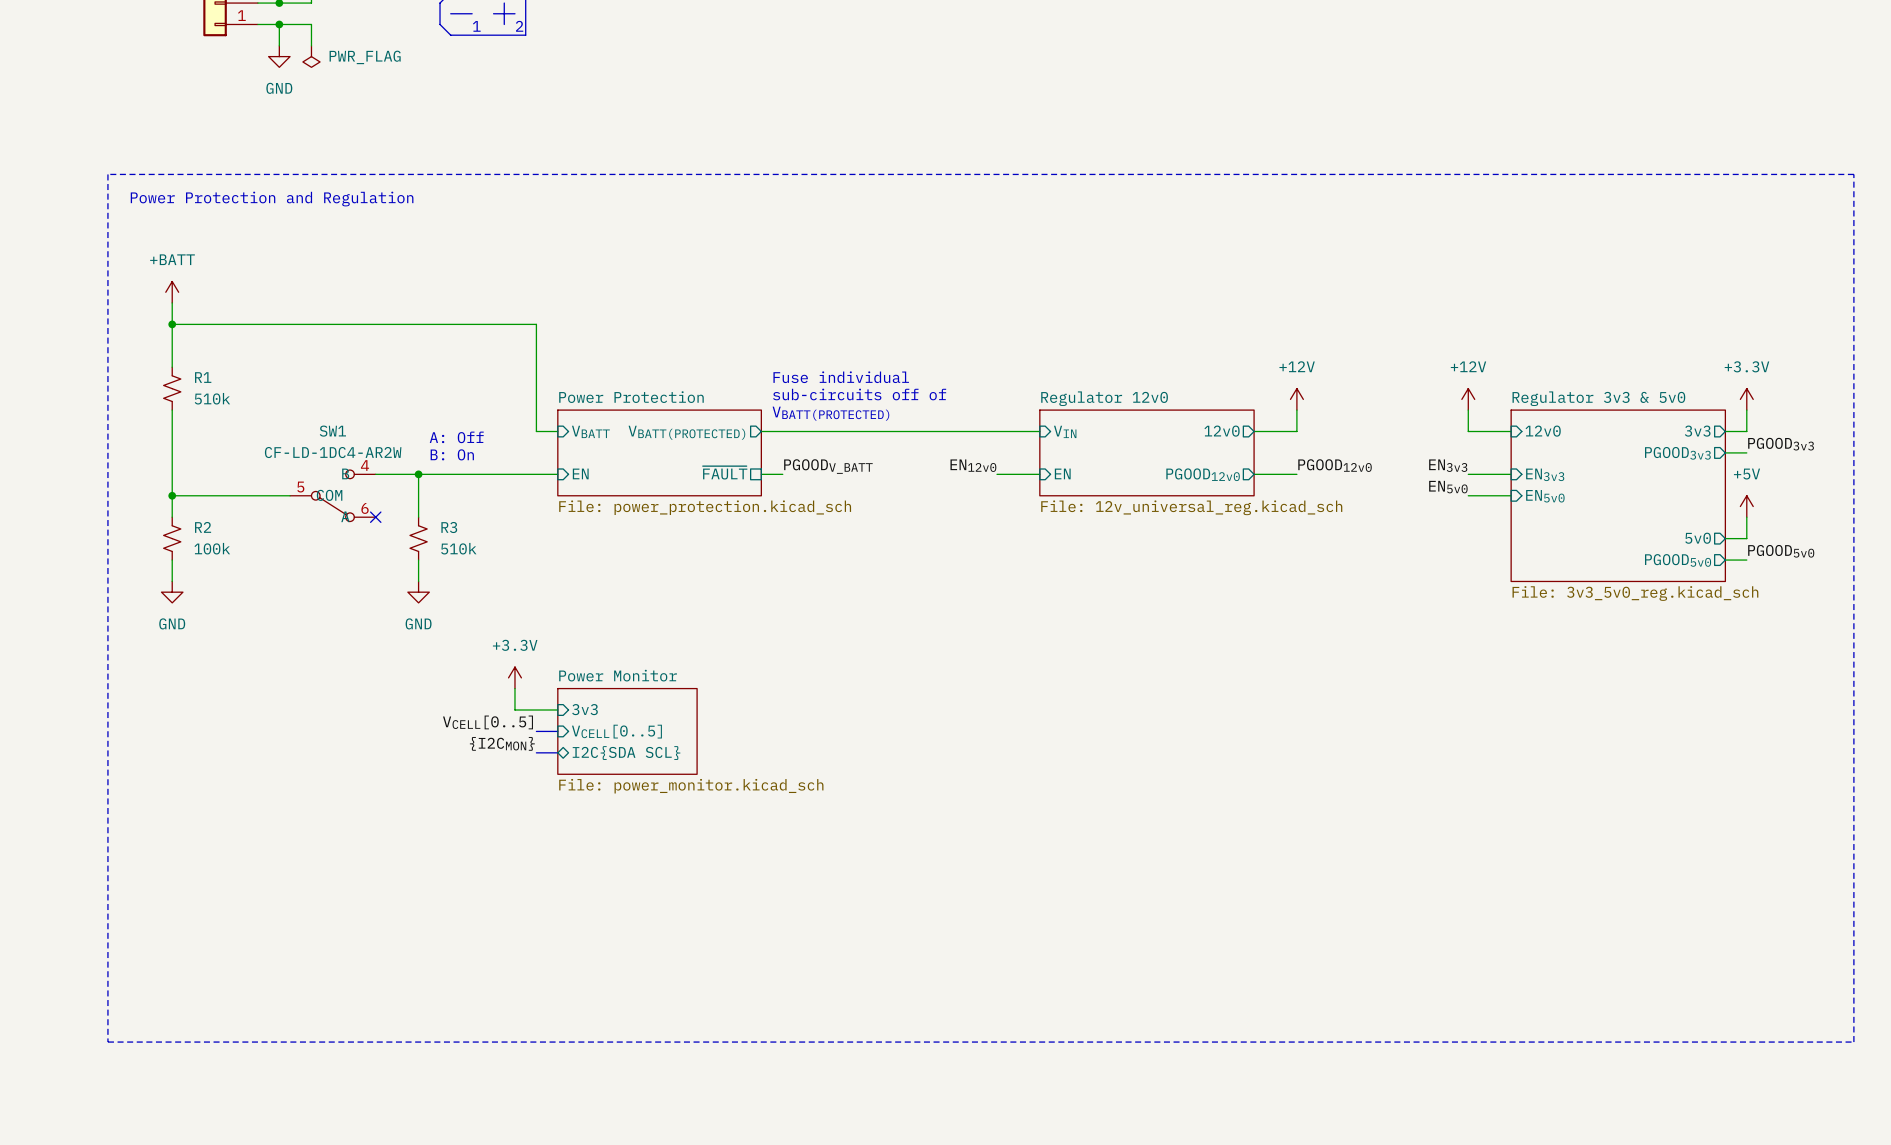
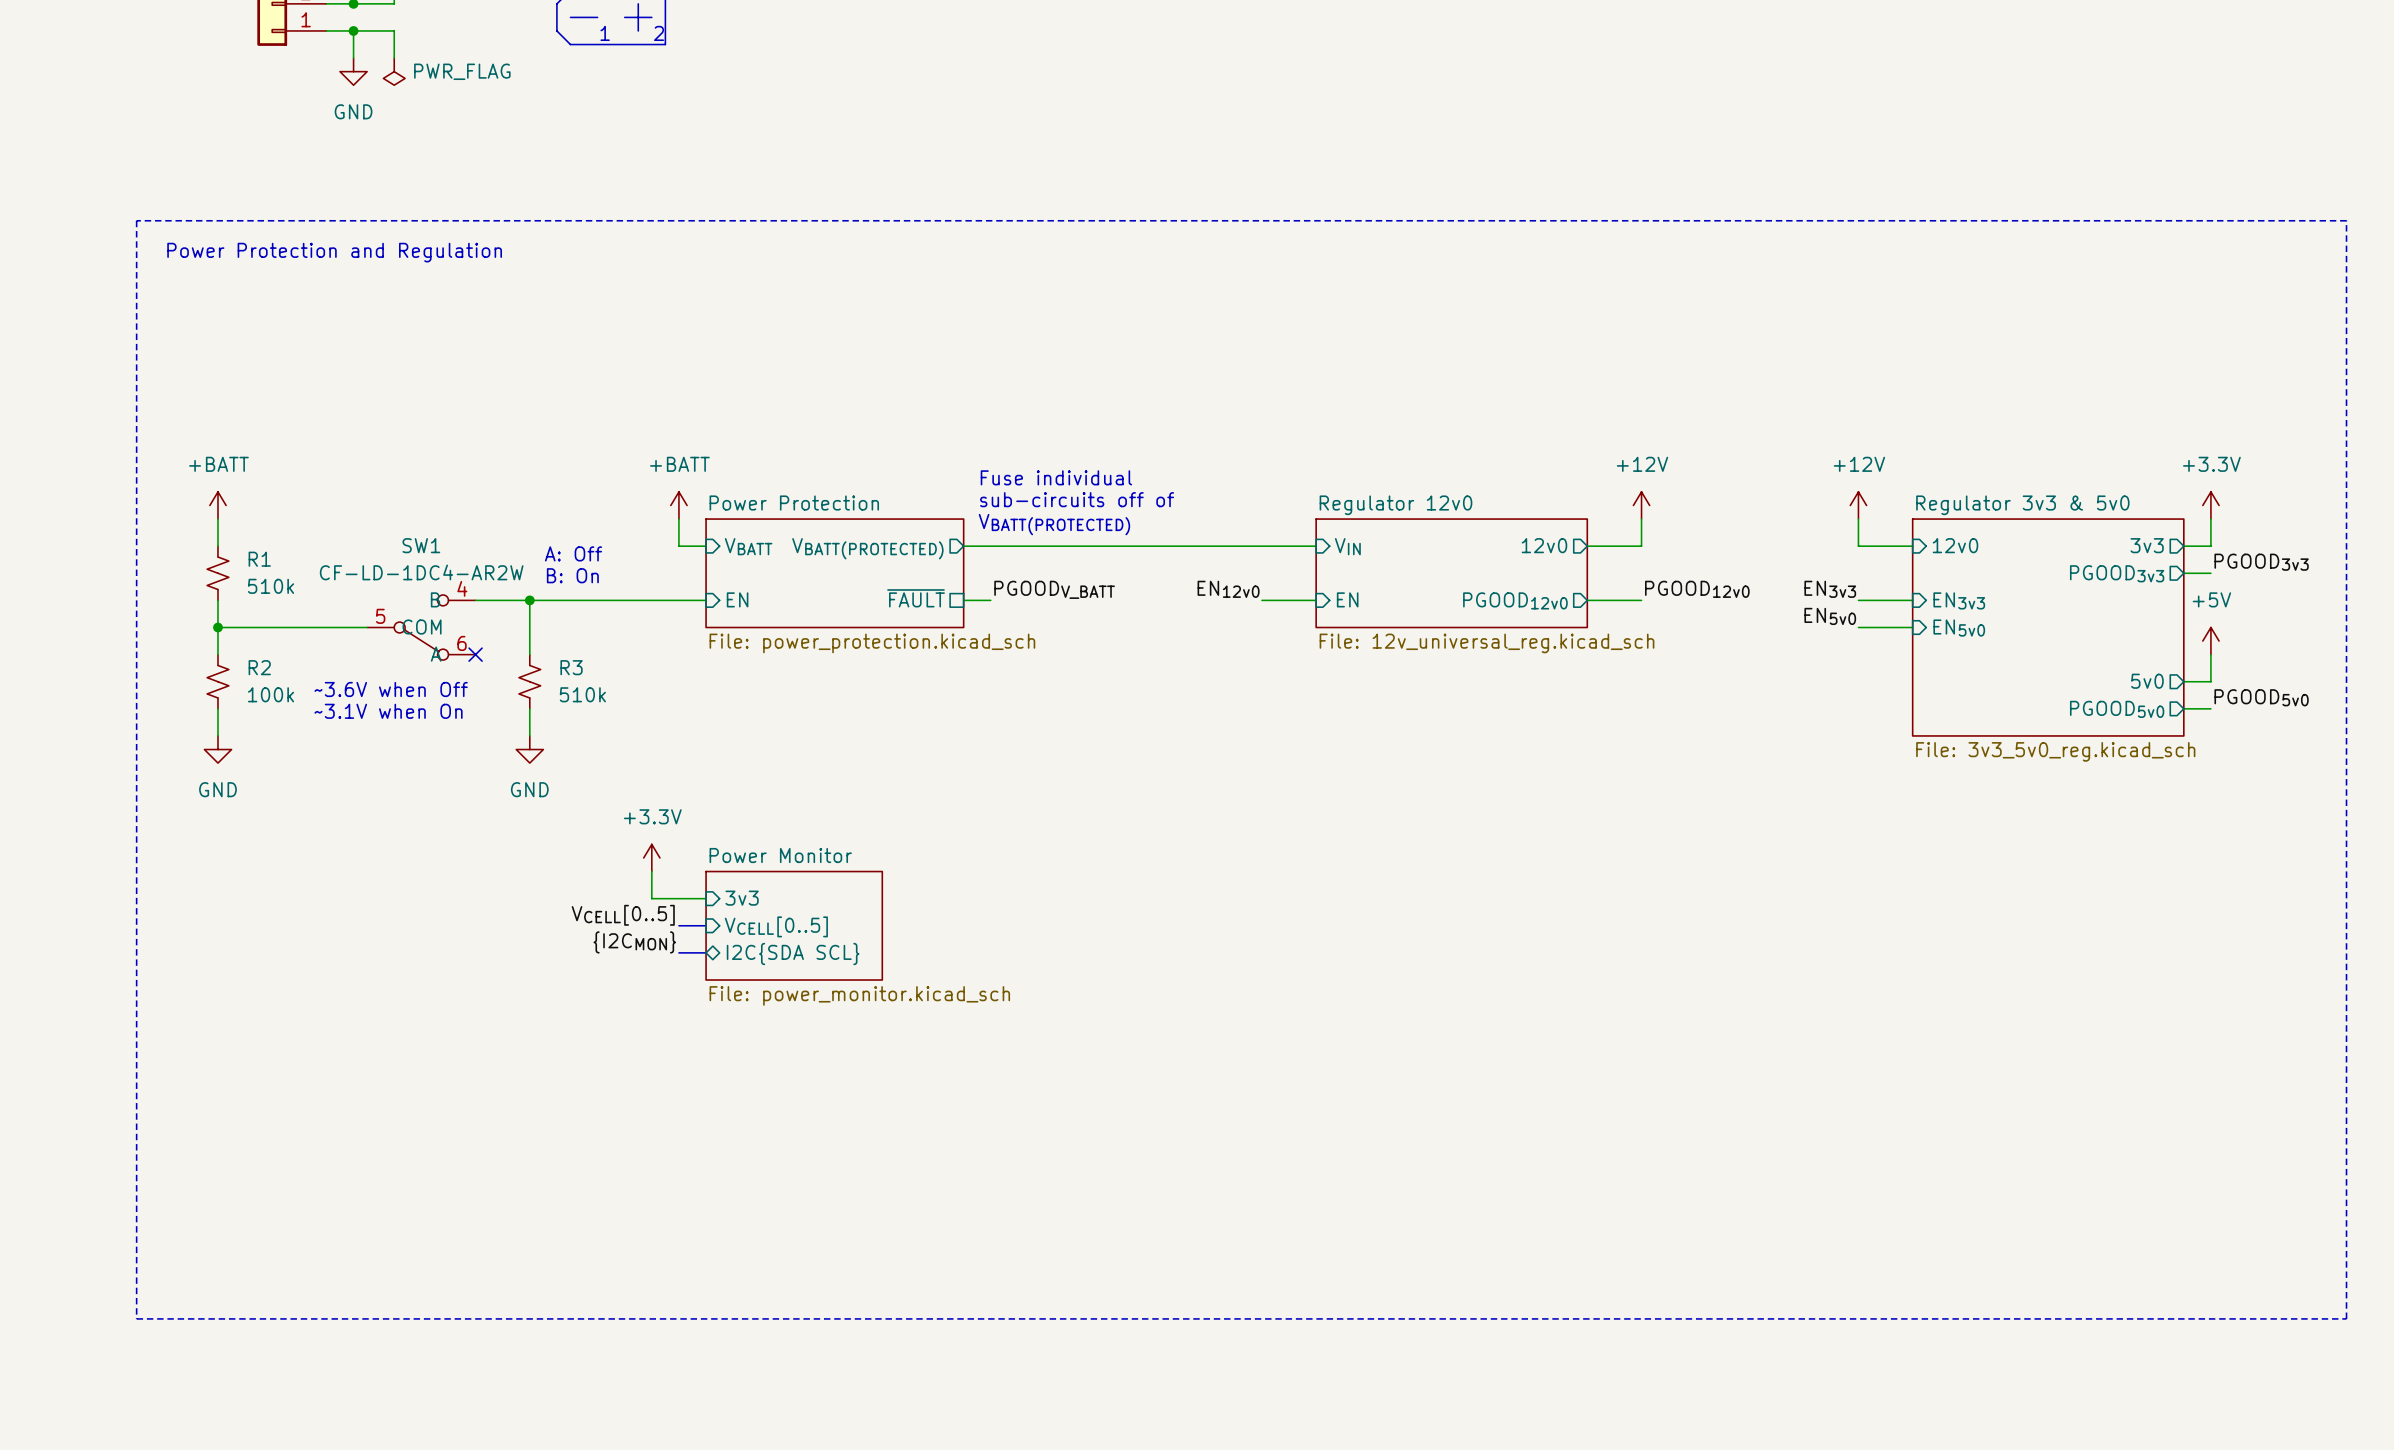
power symbol position: +BATT (172, 292) -> +BATT (217, 505)
wire: (172, 302) (172, 367) -> none
wire: (172, 324) (536, 324) (536, 410) -> none
junction: (172, 324) -> none
R1 position: (172, 388) -> (217, 573)
power symbol: none -> +BATT (678, 505)
text: none -> ~3.6V when Off (391, 689)
text: none -> ~3.1V when On (388, 711)

